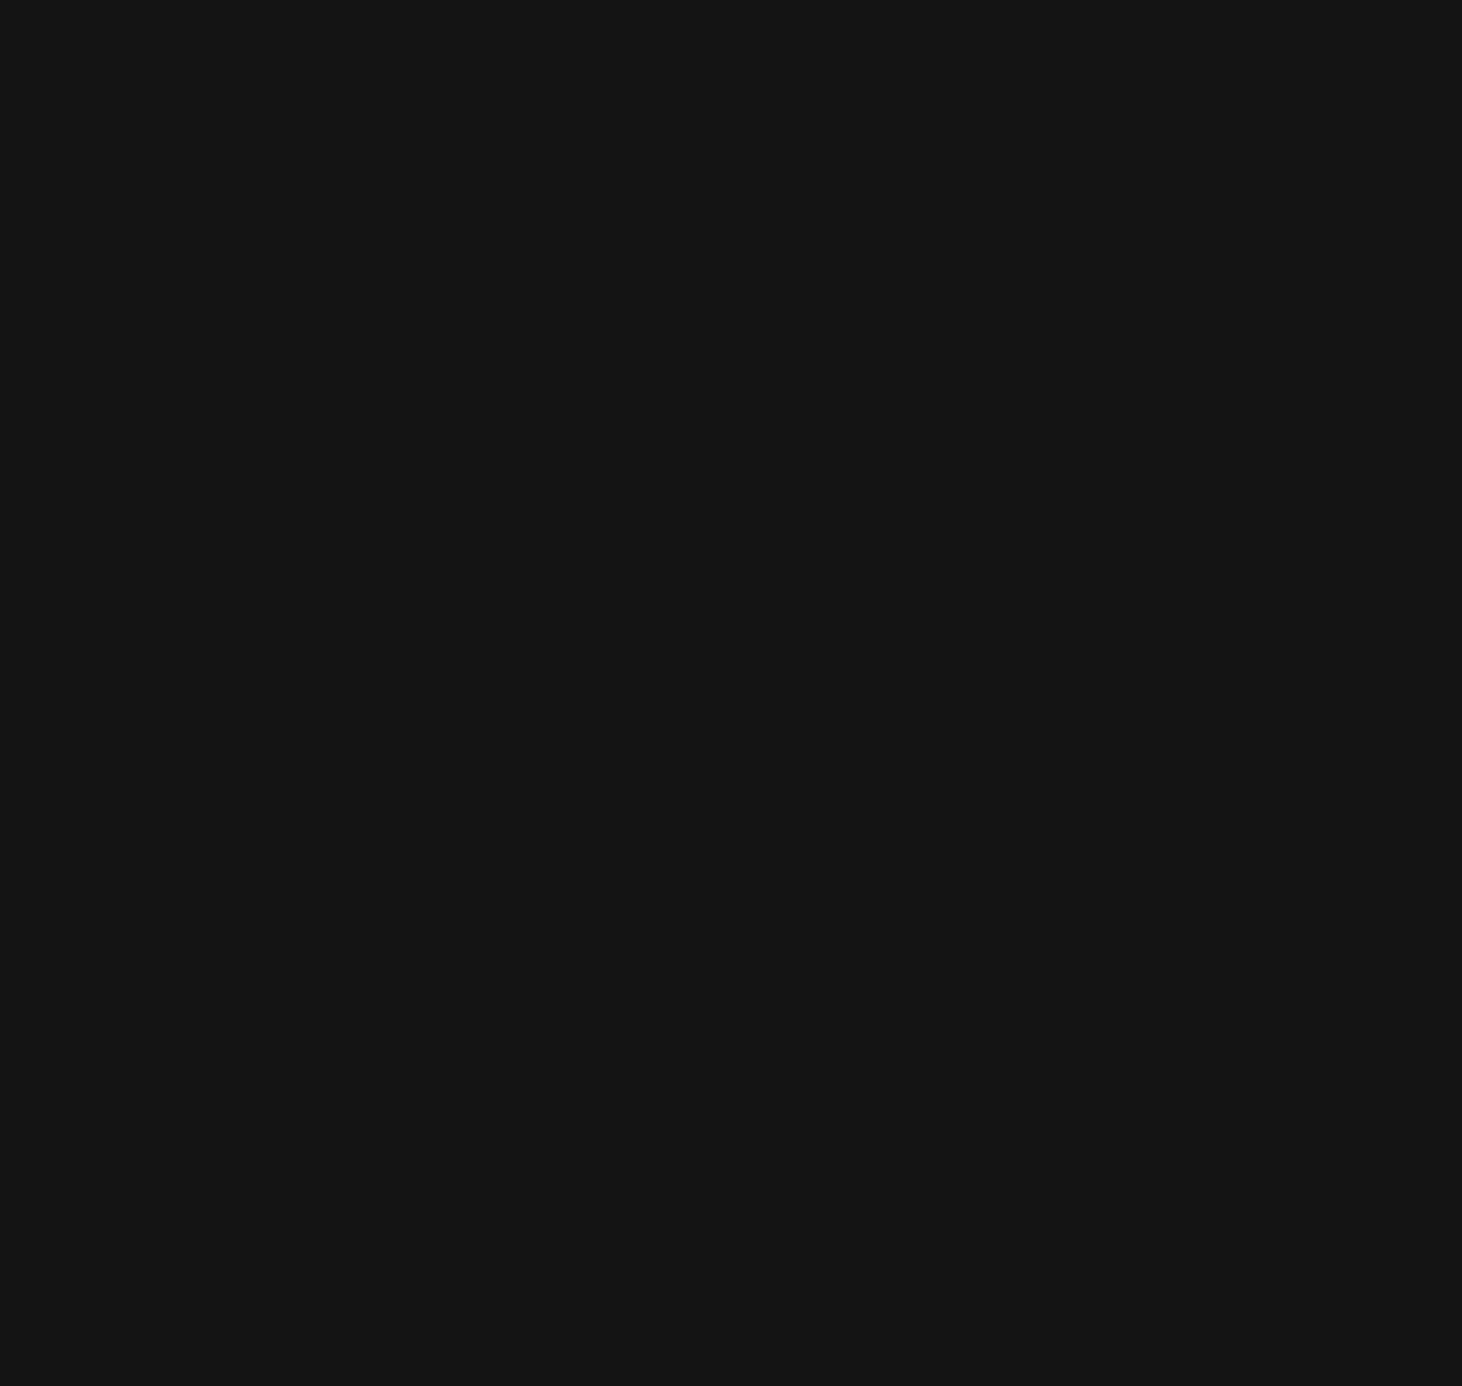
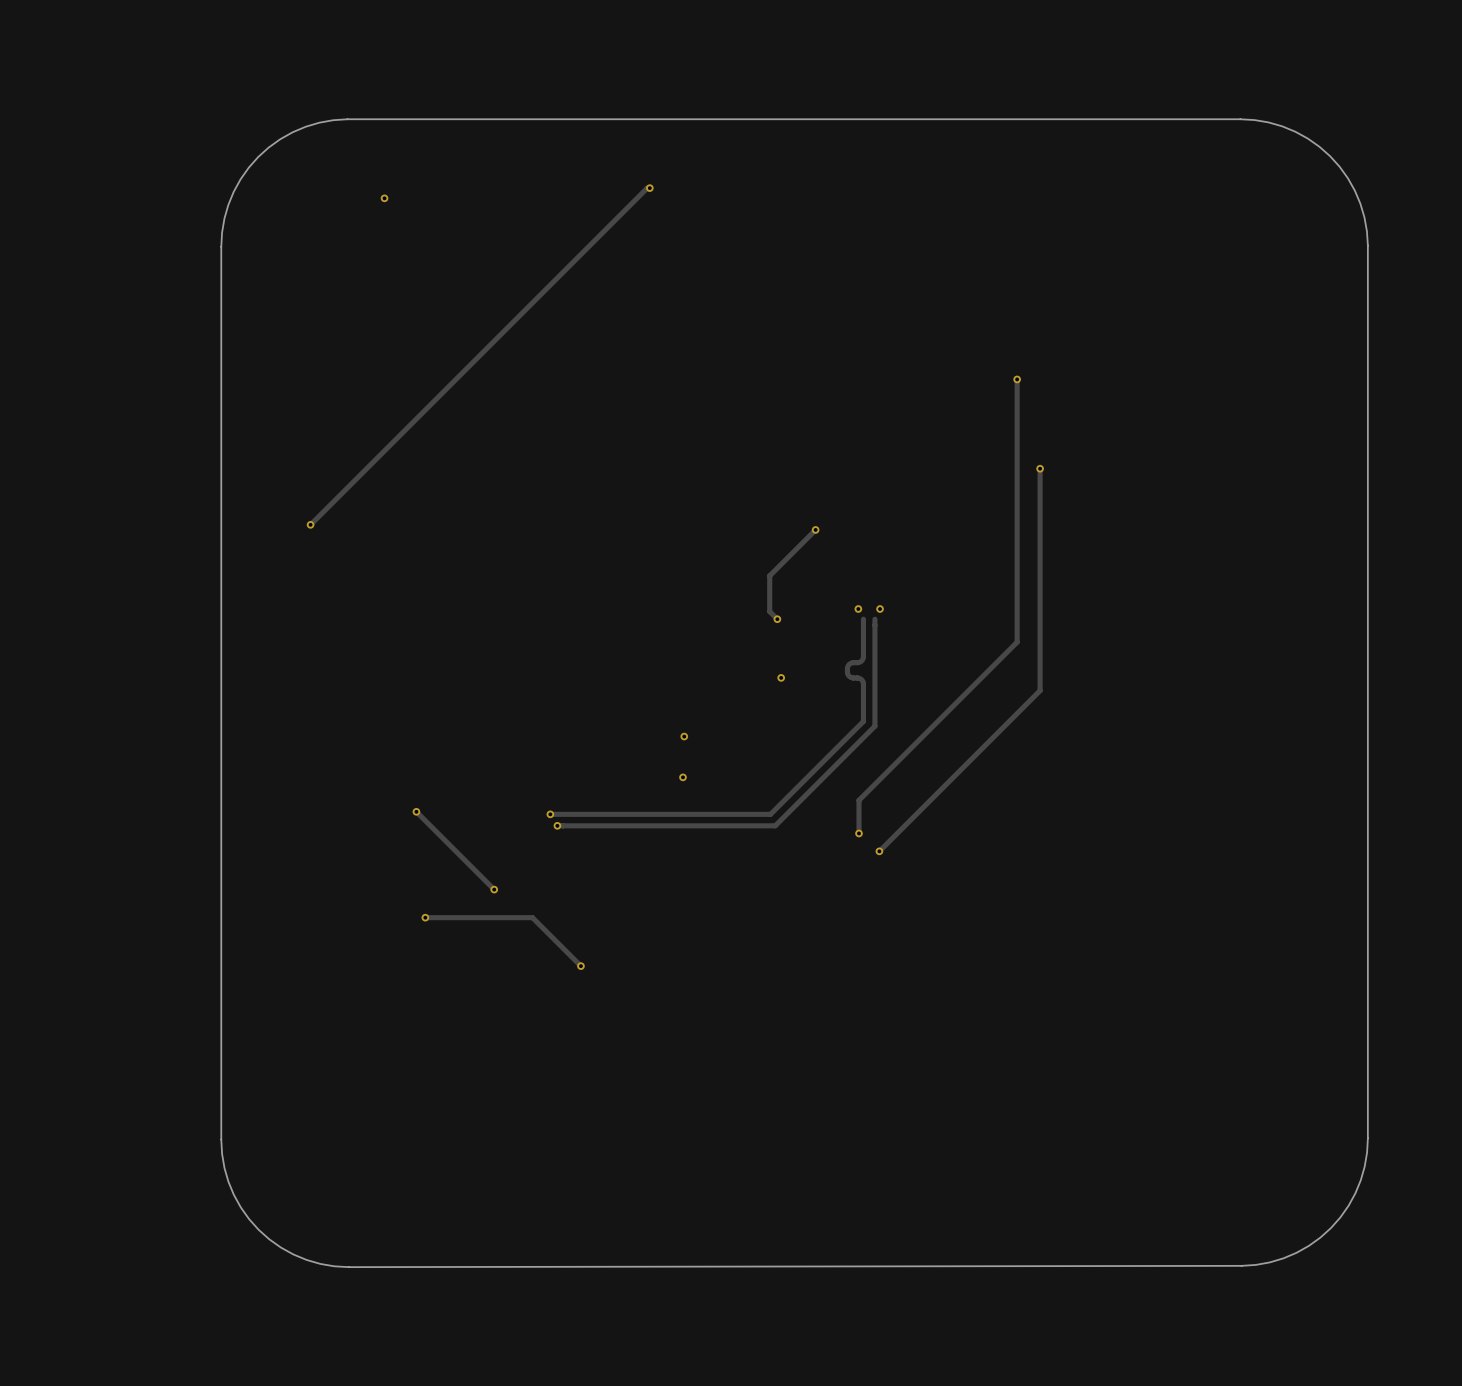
board edge: none -> (1240, 119) (347, 119) (319, 122) (292, 132) (268, 147) (248, 167) (233, 191) (228, 204) (222, 232) (221, 246) (221, 1139) (224, 1167) (233, 1194) (249, 1219) (269, 1239) (280, 1247) (306, 1259) (334, 1266) (348, 1267) (1241, 1265) (1269, 1262) (1296, 1252) (1320, 1237) (1340, 1217) (1348, 1205) (1360, 1180) (1367, 1152) (1367, 1138) (1366, 231) (1364, 217) (1354, 190) (1339, 166) (1319, 146) (1295, 131) (1282, 126) (1254, 120) (1240, 119)
track: none -> (649, 188) (647, 188) (310, 524)
via: none -> (649, 188)
via: none -> (384, 198)
track: none -> (1017, 379) (1017, 642) (858, 800) (858, 833)
via: none -> (1017, 379)
track: none -> (1040, 468) (1040, 690) (879, 851)
via: none -> (1040, 468)
via: none -> (310, 524)
track: none -> (815, 529) (769, 575) (769, 611) (777, 619)
via: none -> (815, 529)
via: none -> (858, 609)
via: none -> (880, 609)
via: none -> (777, 619)
track: none -> (863, 619) (863, 658) (859, 662) (850, 663) (847, 668) (849, 676) (859, 678) (863, 682) (863, 721) (770, 814) (550, 814)
track: none -> (874, 619) (874, 726) (775, 825) (557, 825)
via: none -> (781, 677)
via: none -> (684, 736)
via: none -> (682, 777)
track: none -> (416, 811) (494, 889)
via: none -> (416, 811)
via: none -> (550, 814)
via: none -> (557, 825)
via: none -> (858, 833)
via: none -> (879, 851)
via: none -> (494, 889)
track: none -> (425, 917) (532, 917) (580, 966)
via: none -> (425, 917)
via: none -> (580, 966)

